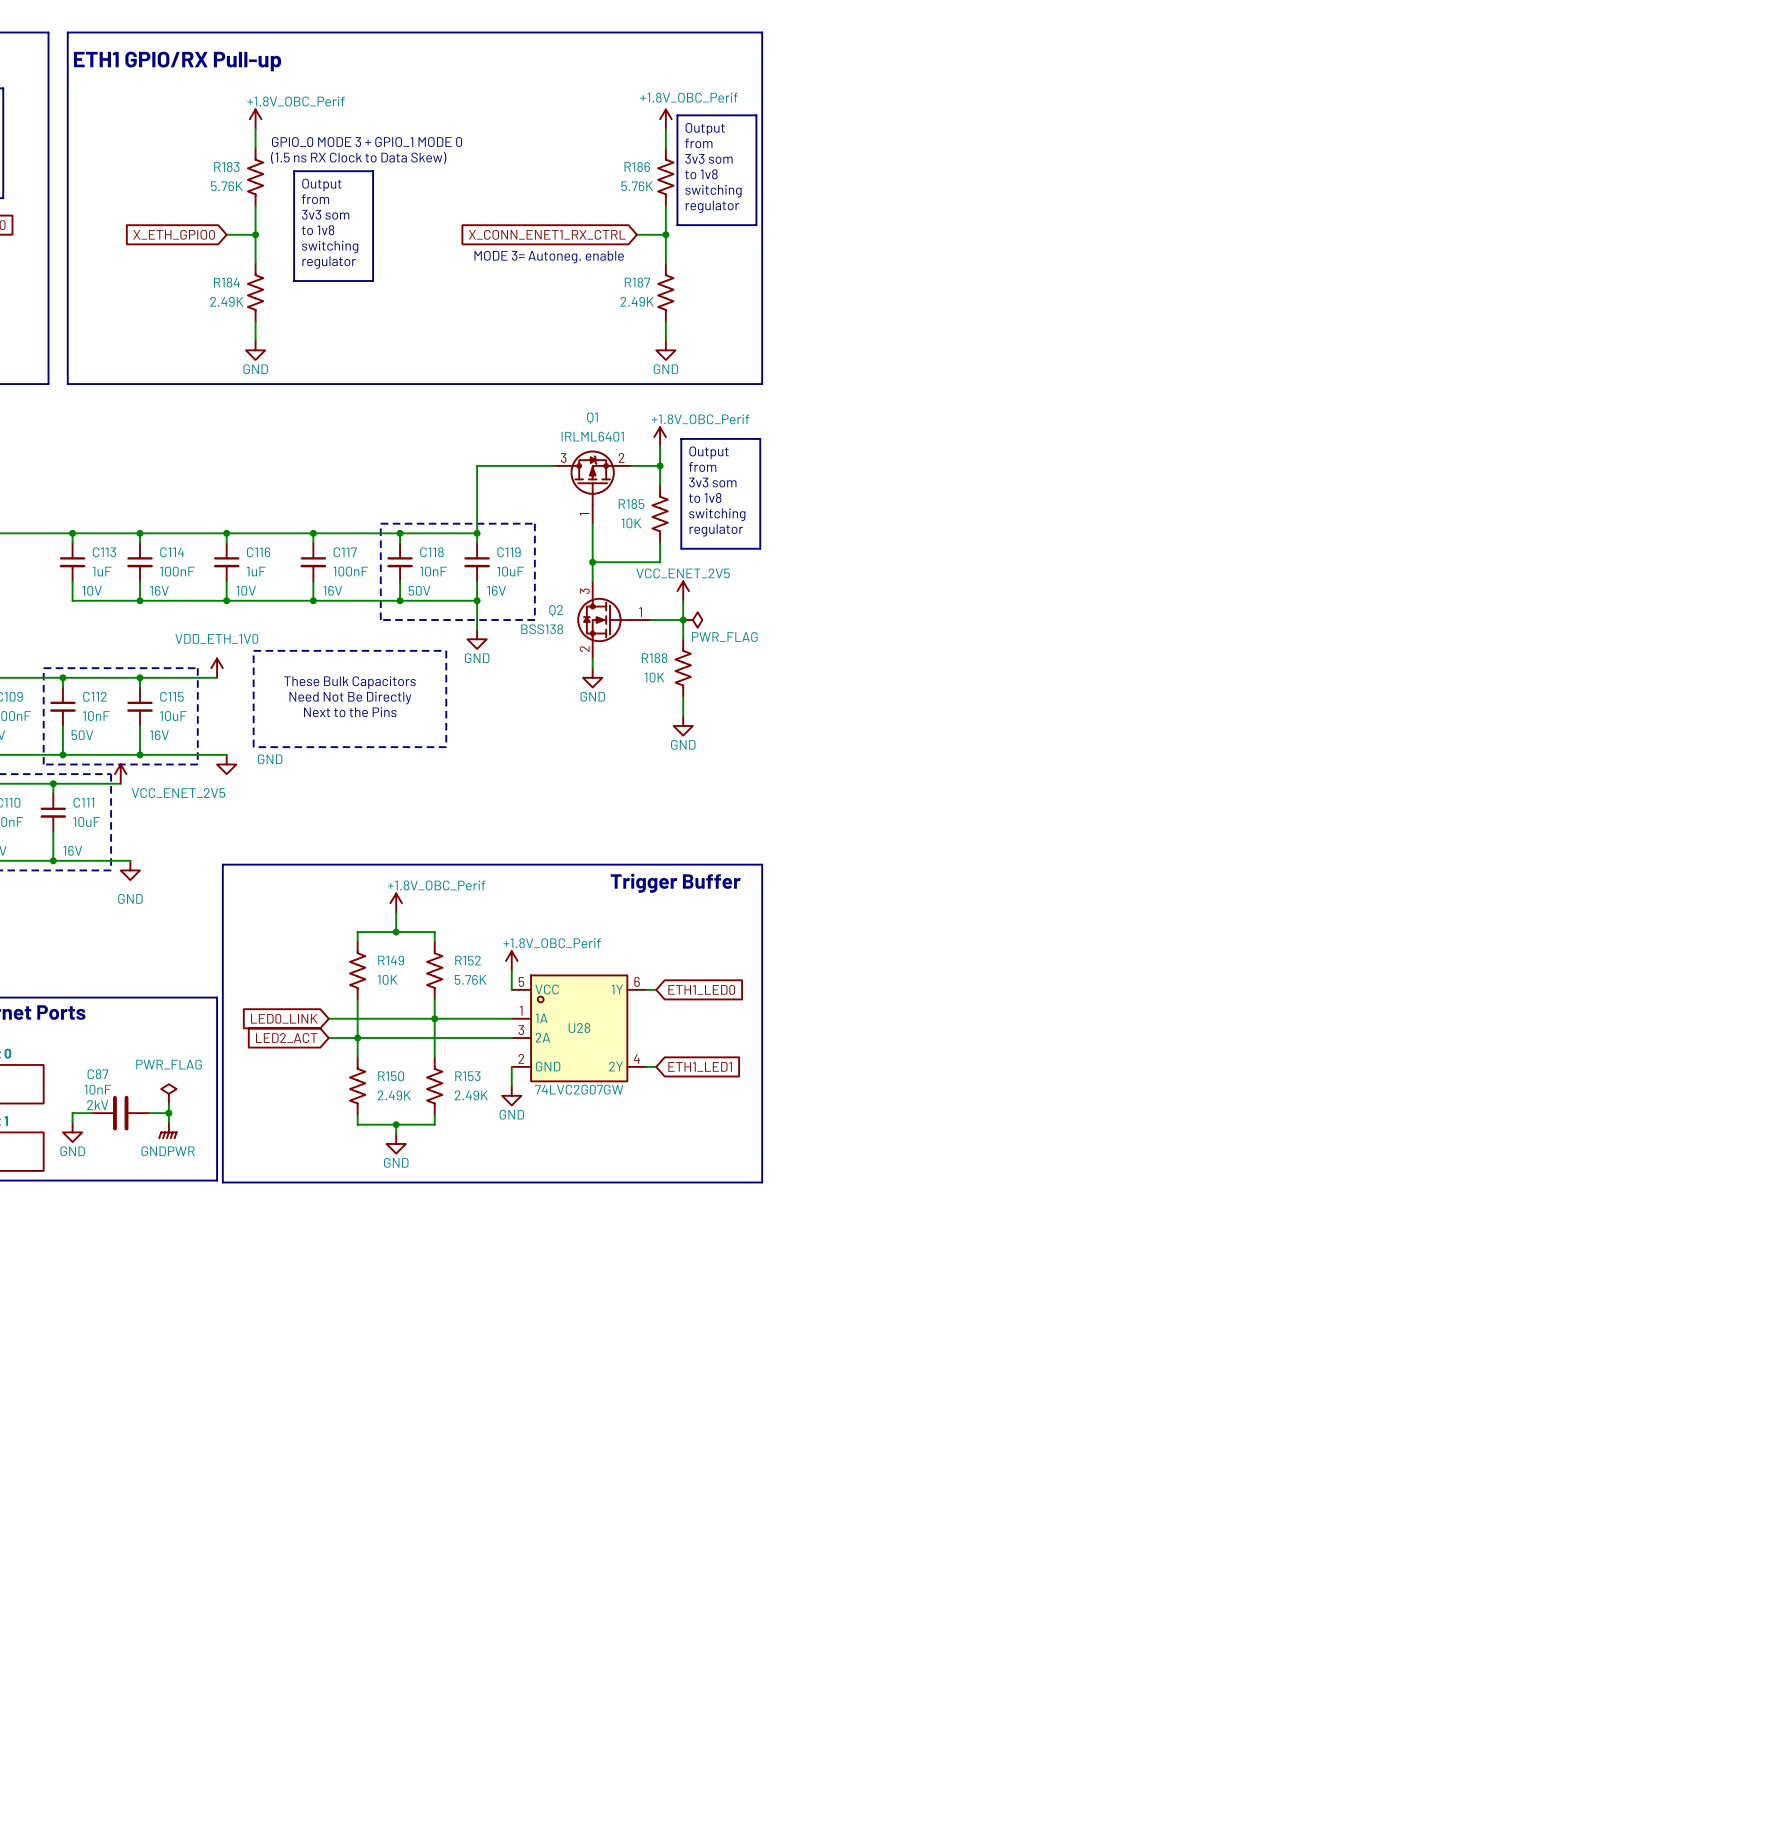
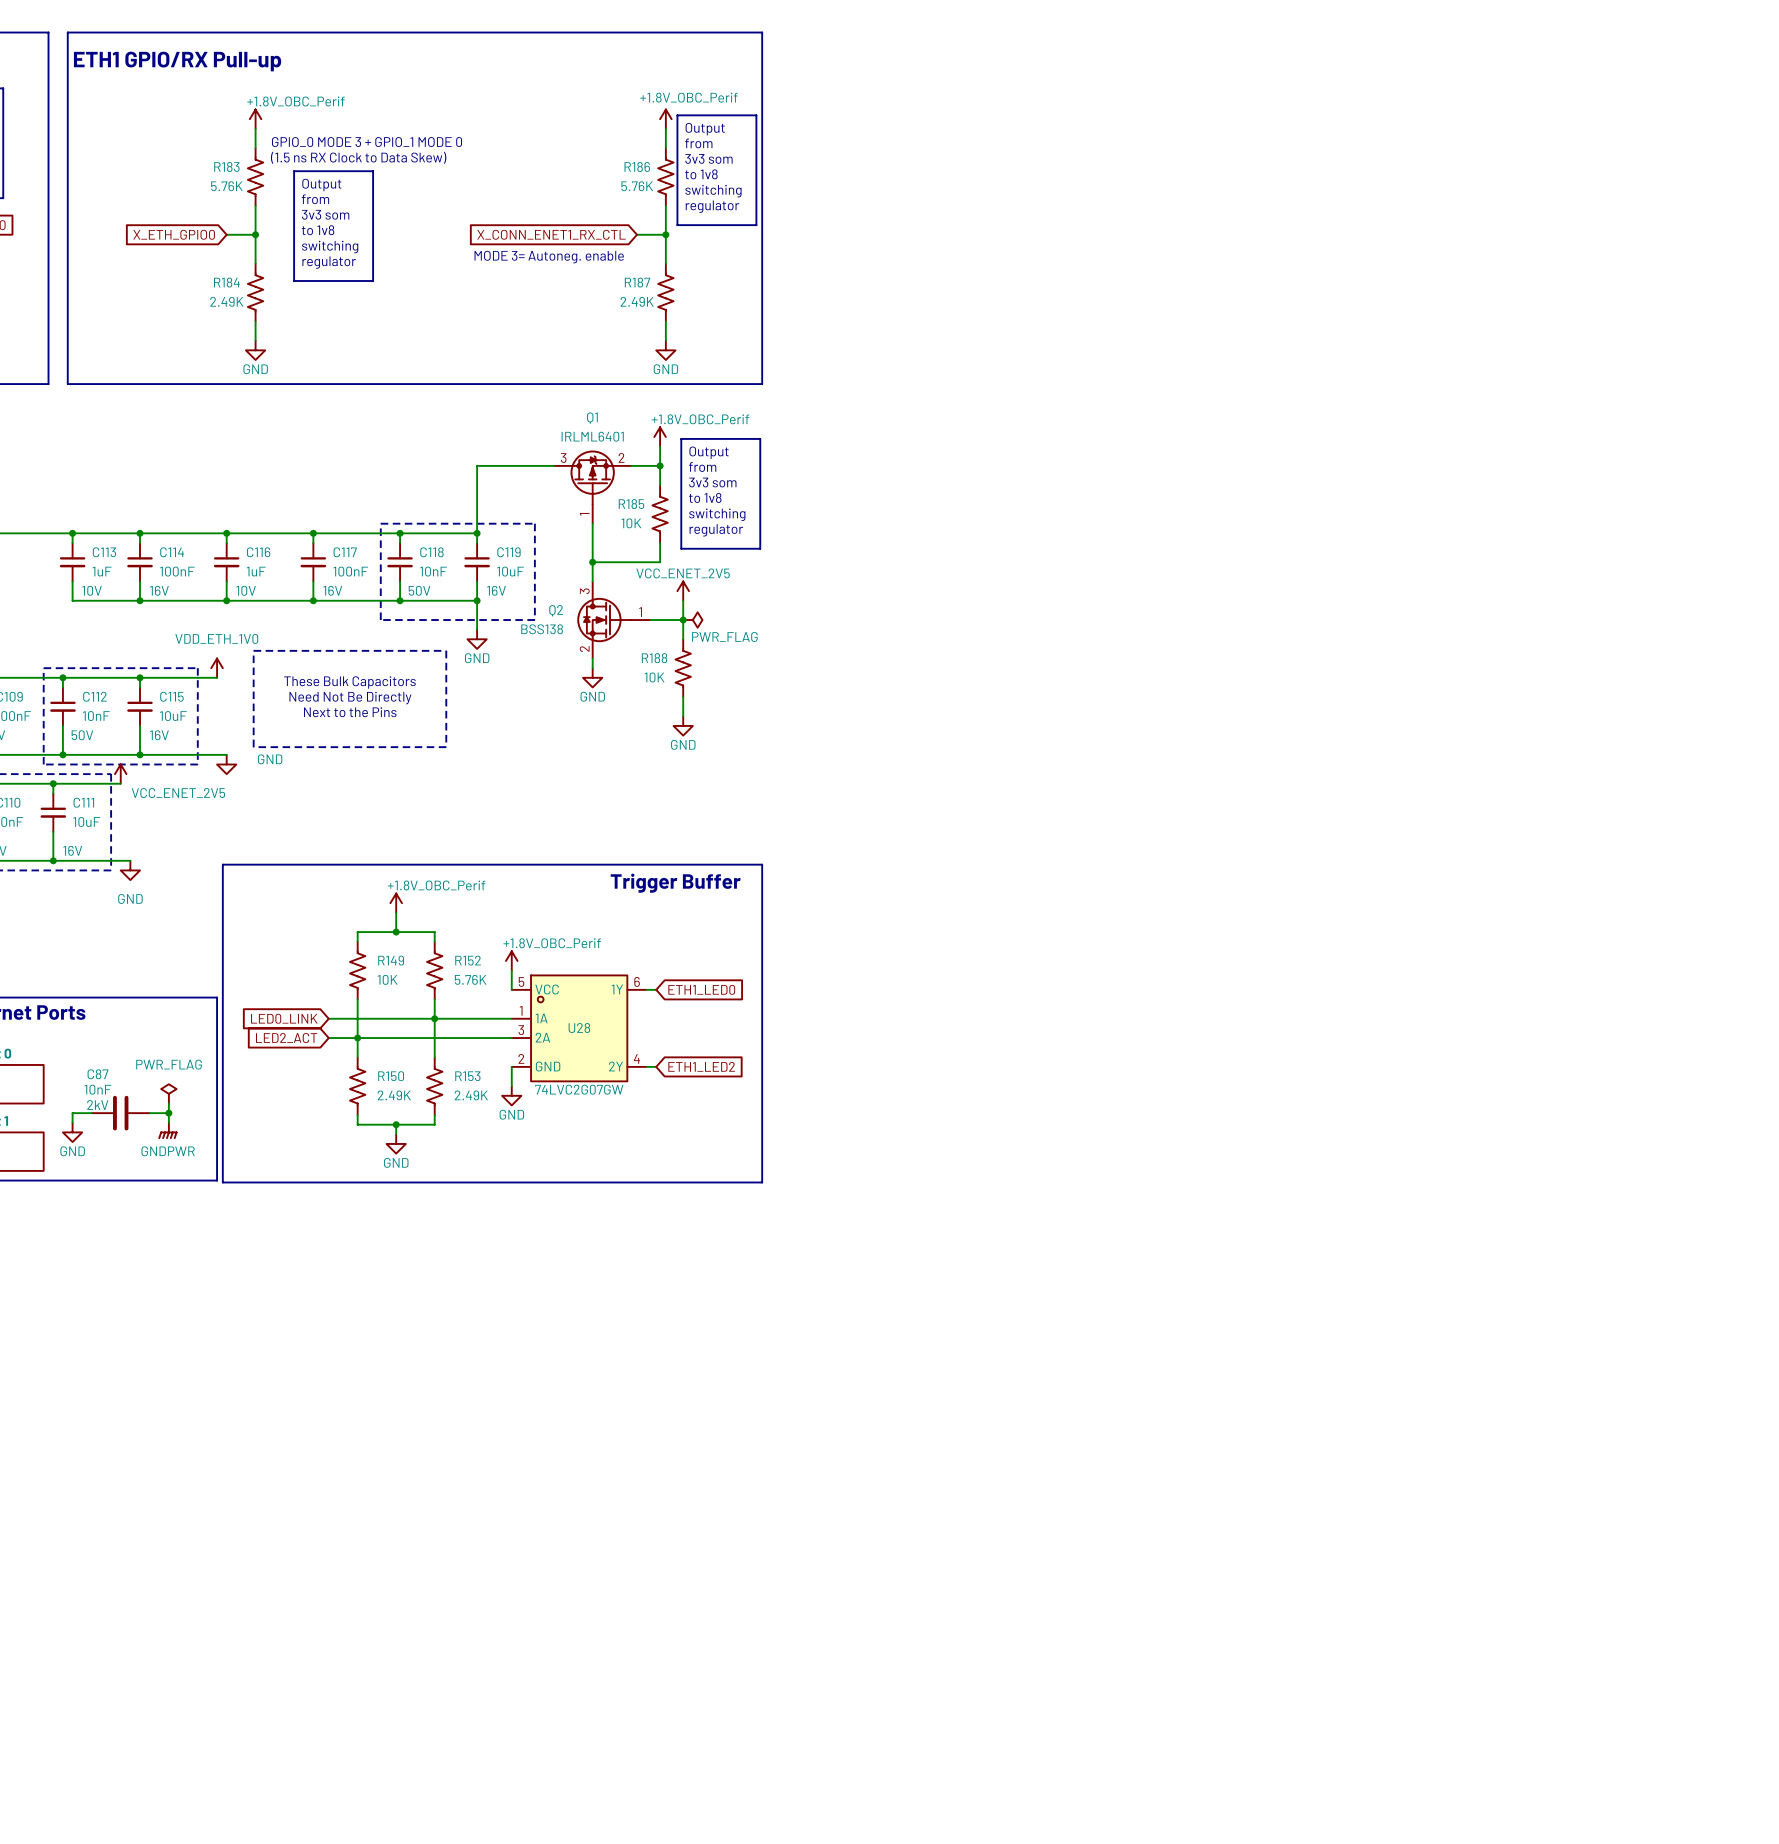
global label: X_CONN_ENET1_RX_CTRL (547, 234) -> X_CONN_ENET1_RX_CTL (551, 234)
global label: ETH1_LED1 (700, 1066) -> ETH1_LED2 (701, 1066)

